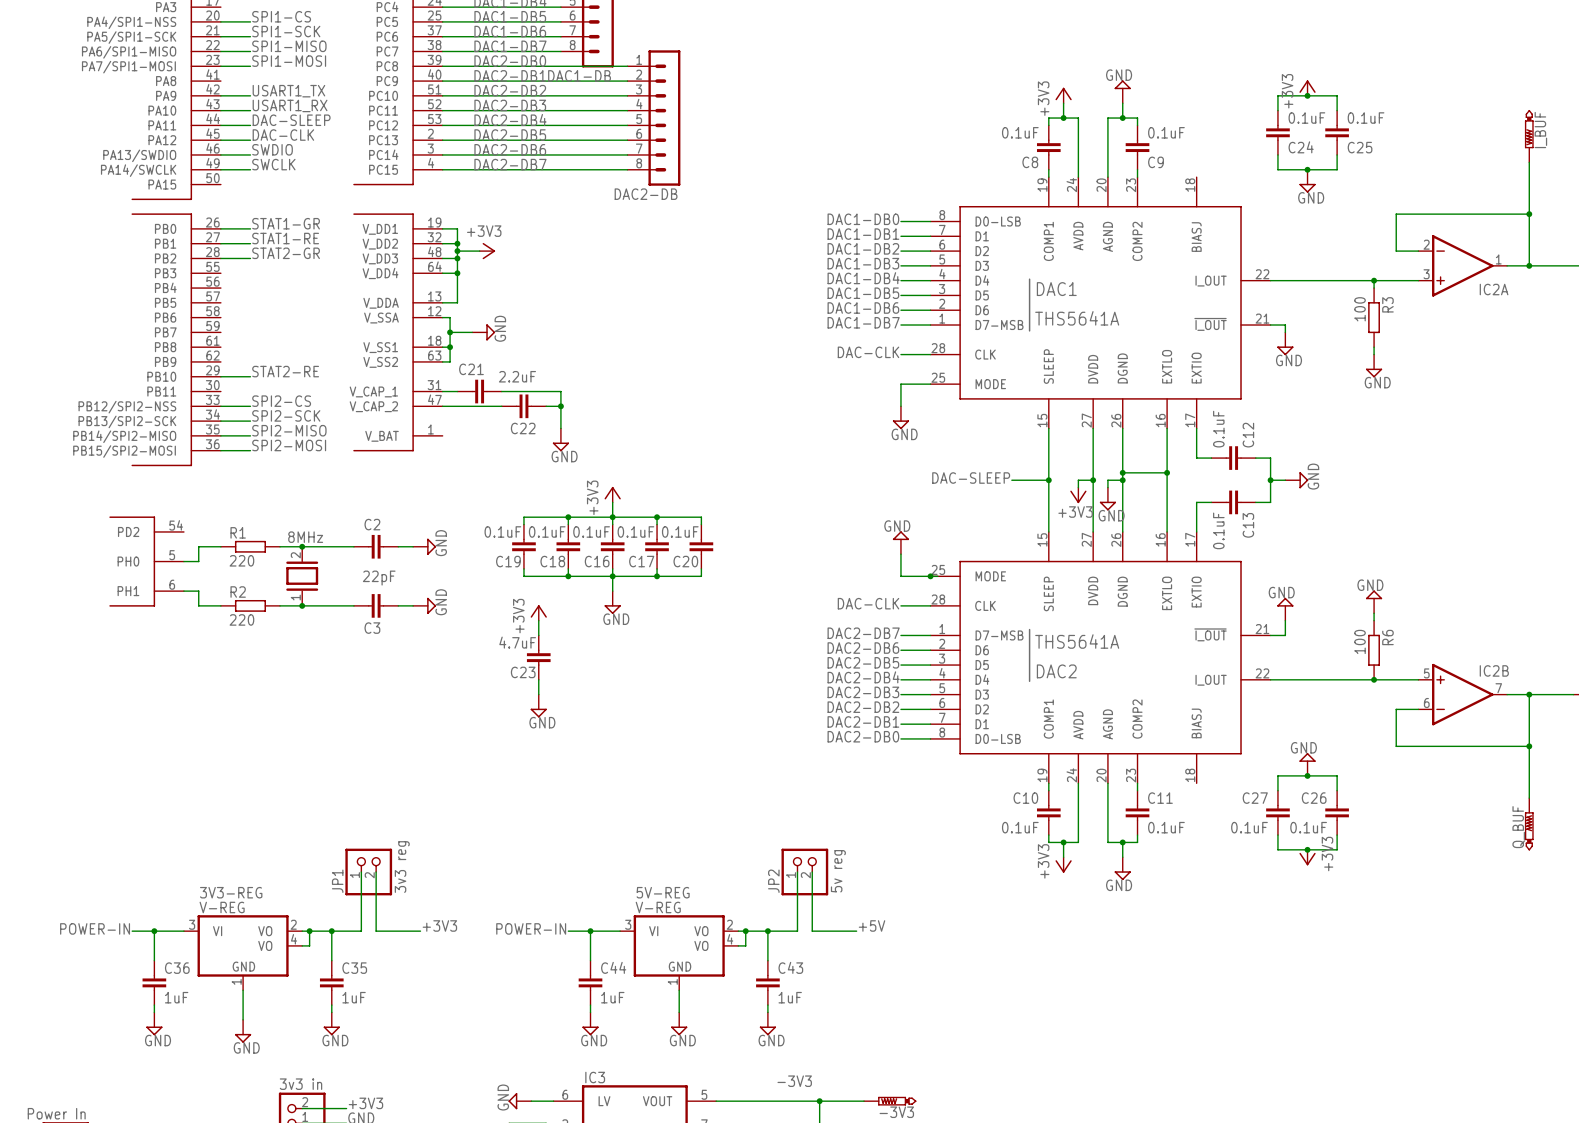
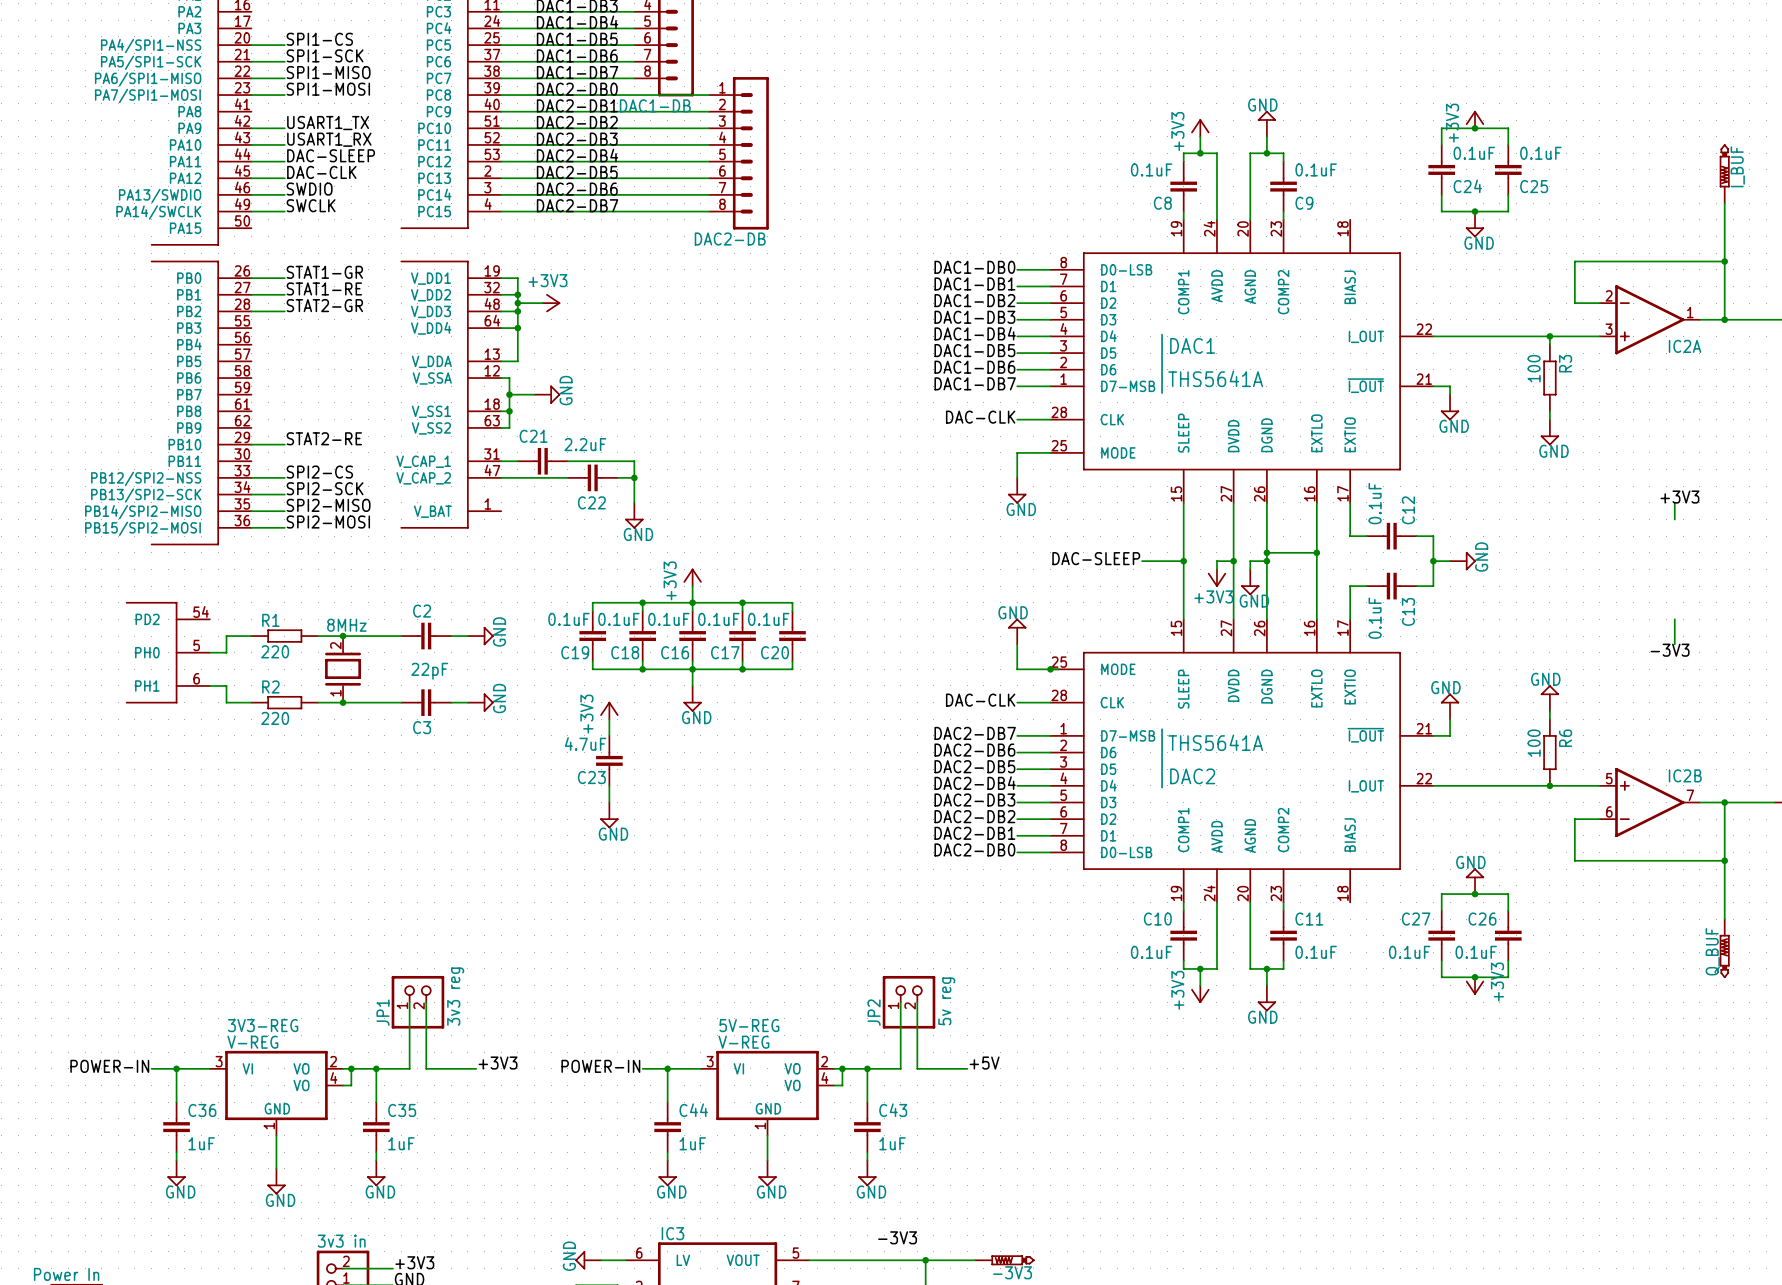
label: none -> +3V3 (1679, 497)
wire: none -> (1674, 502) (1674, 519)
wire: none -> (1674, 619) (1674, 644)
label: none -> -3V3 (1670, 650)

